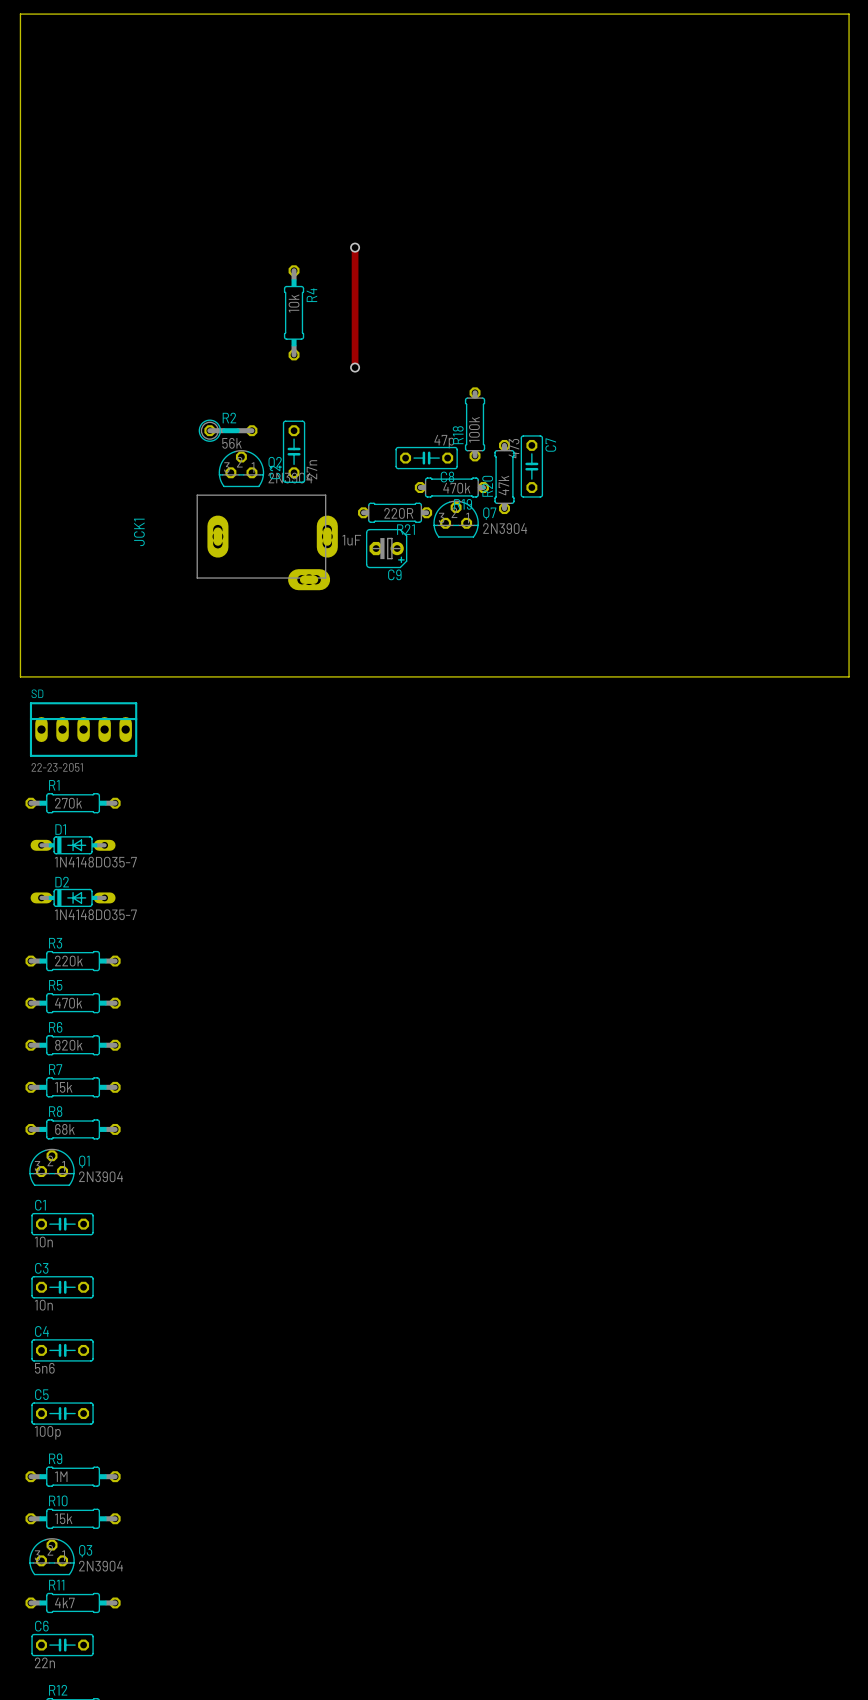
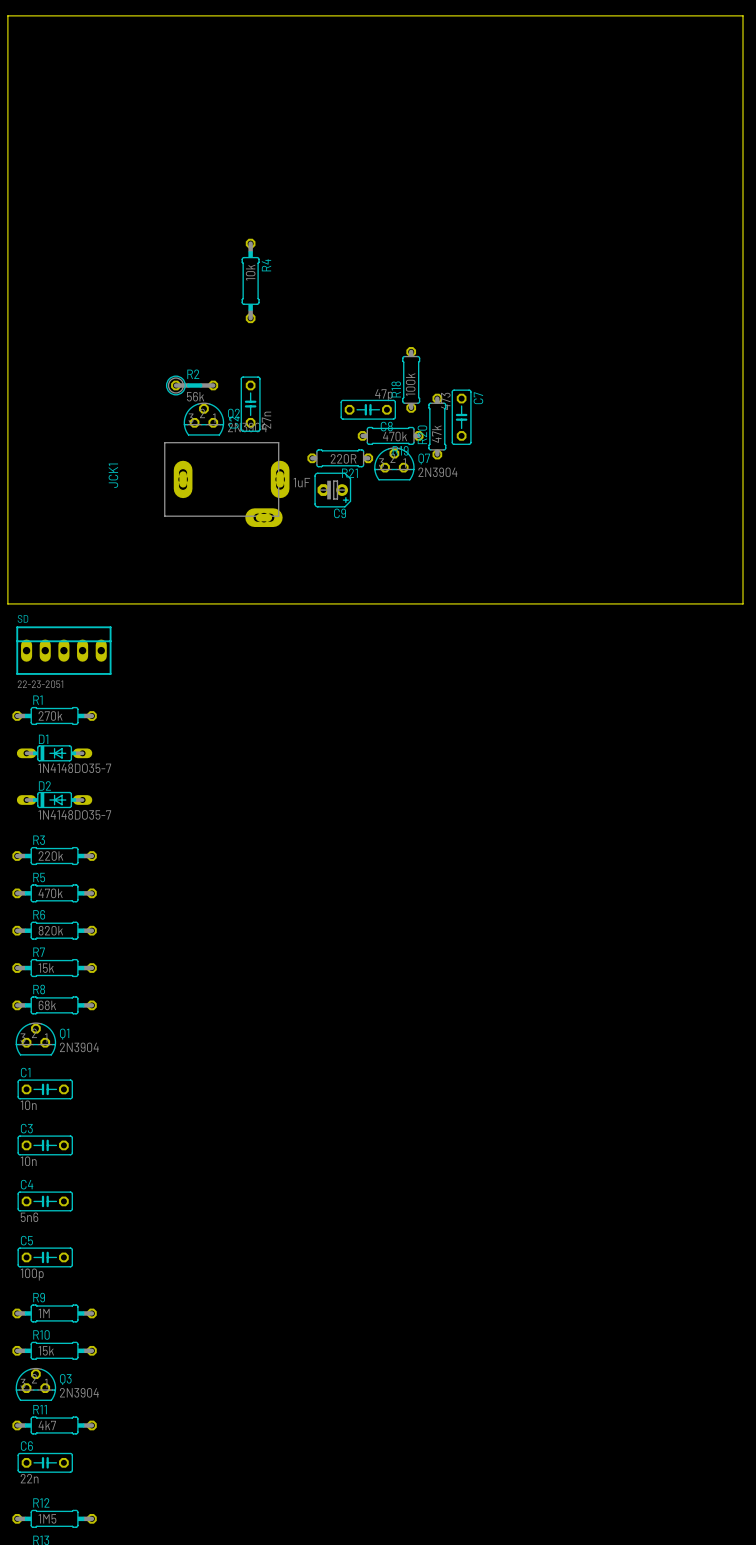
track: (355, 247) (355, 367) -> none
via: (355, 247) -> none
via: (355, 367) -> none

